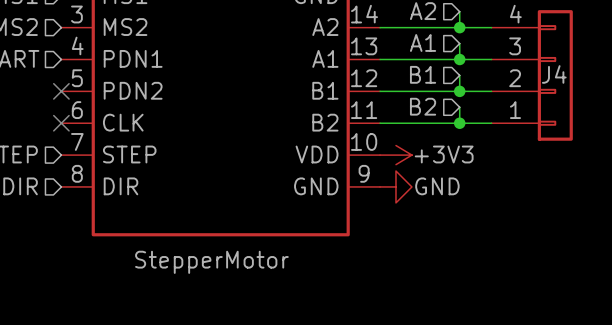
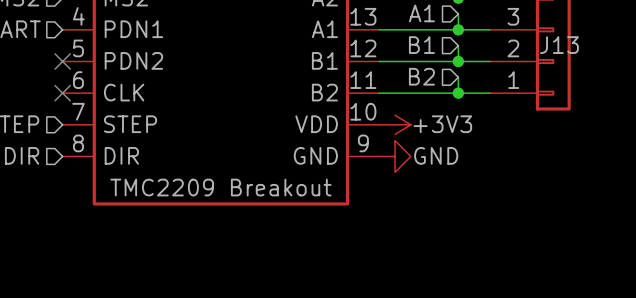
J4 name: J4 (554, 74) -> J13 (559, 45)
part value: StepperMotor (211, 262) -> TMC2209 Breakout (220, 187)

